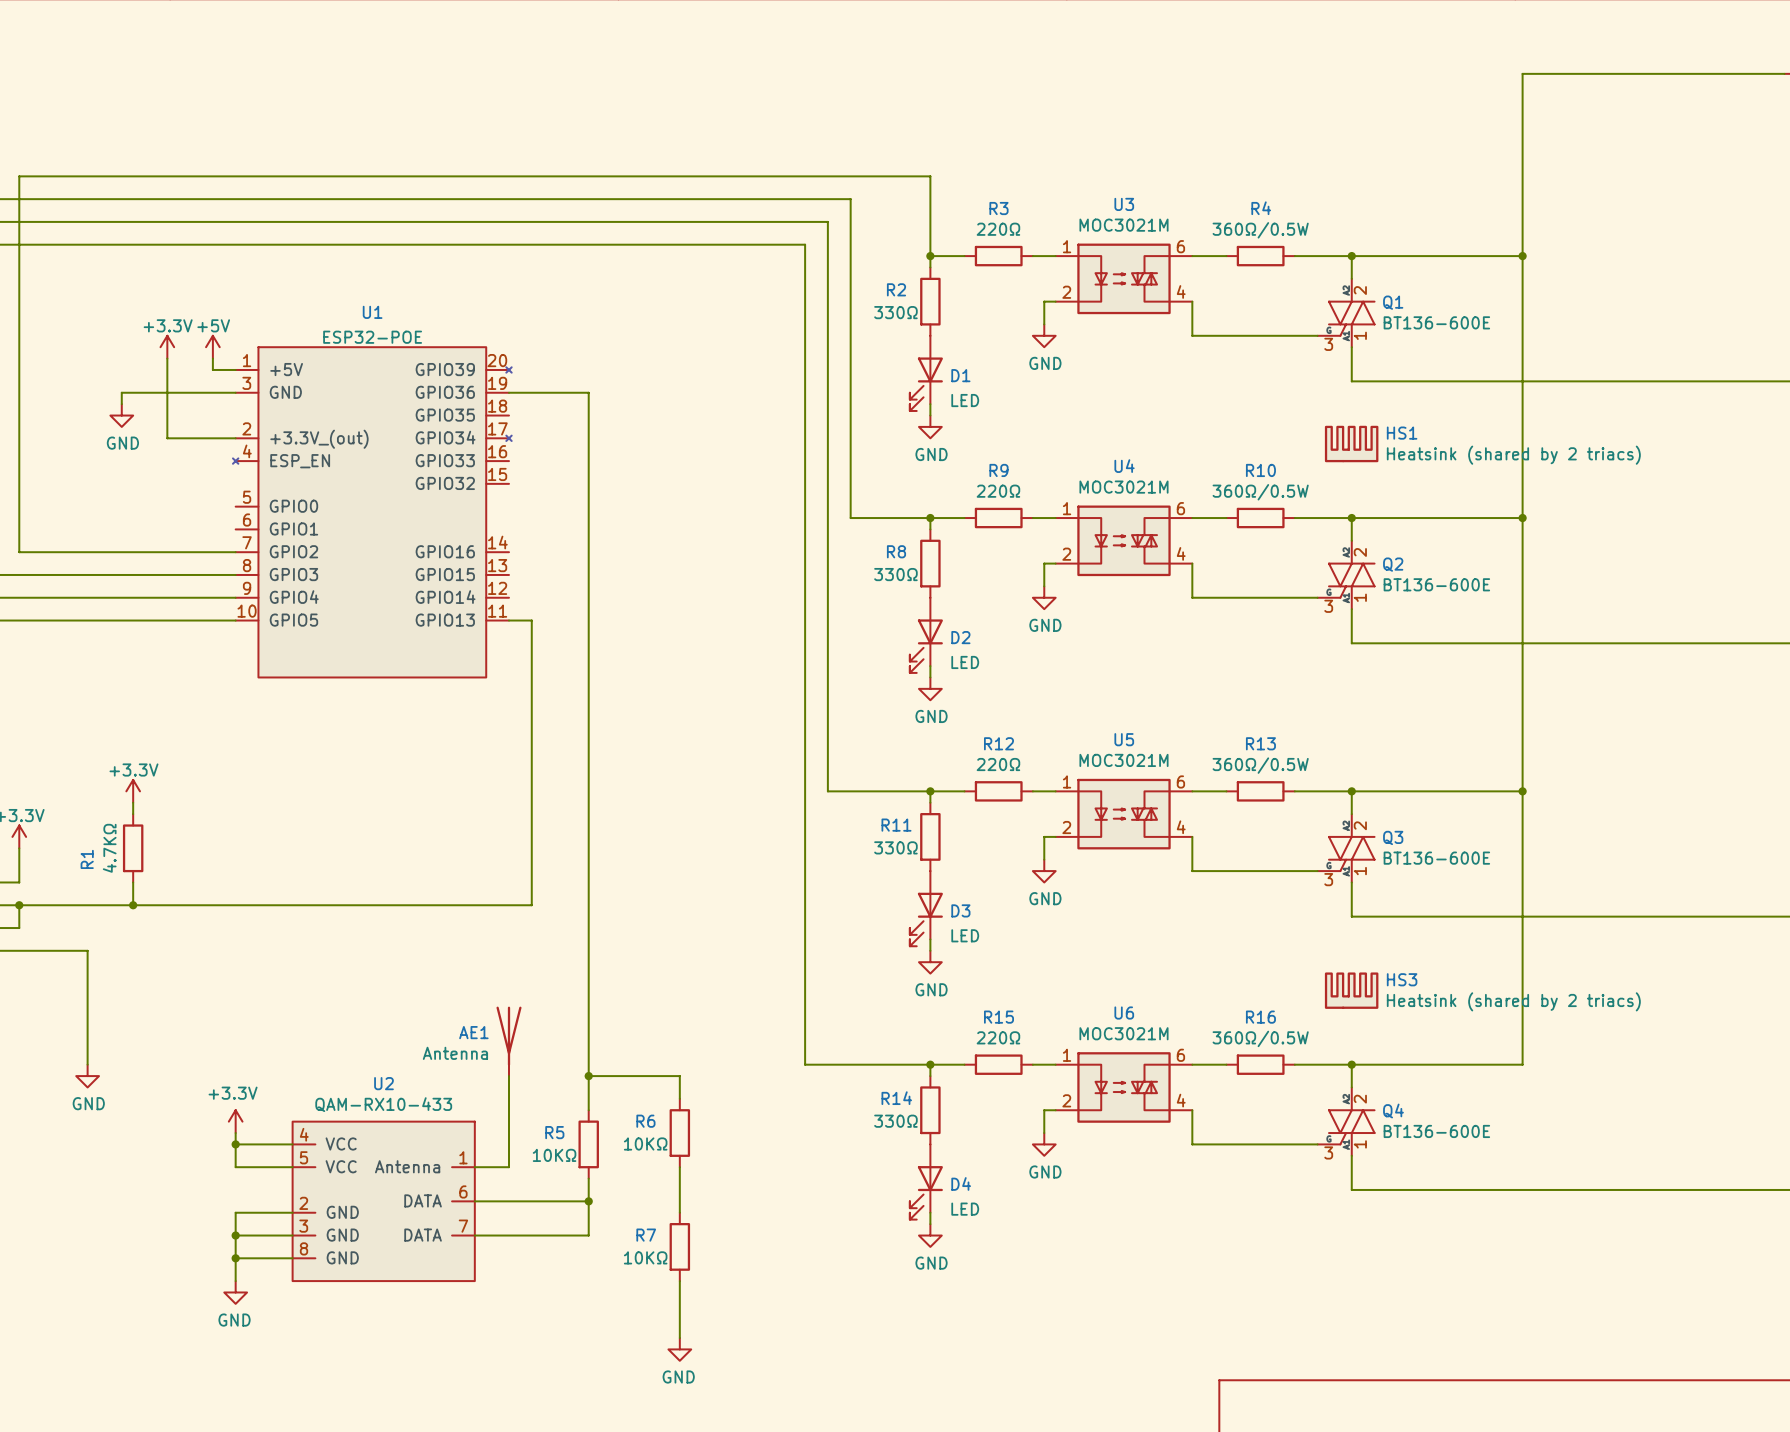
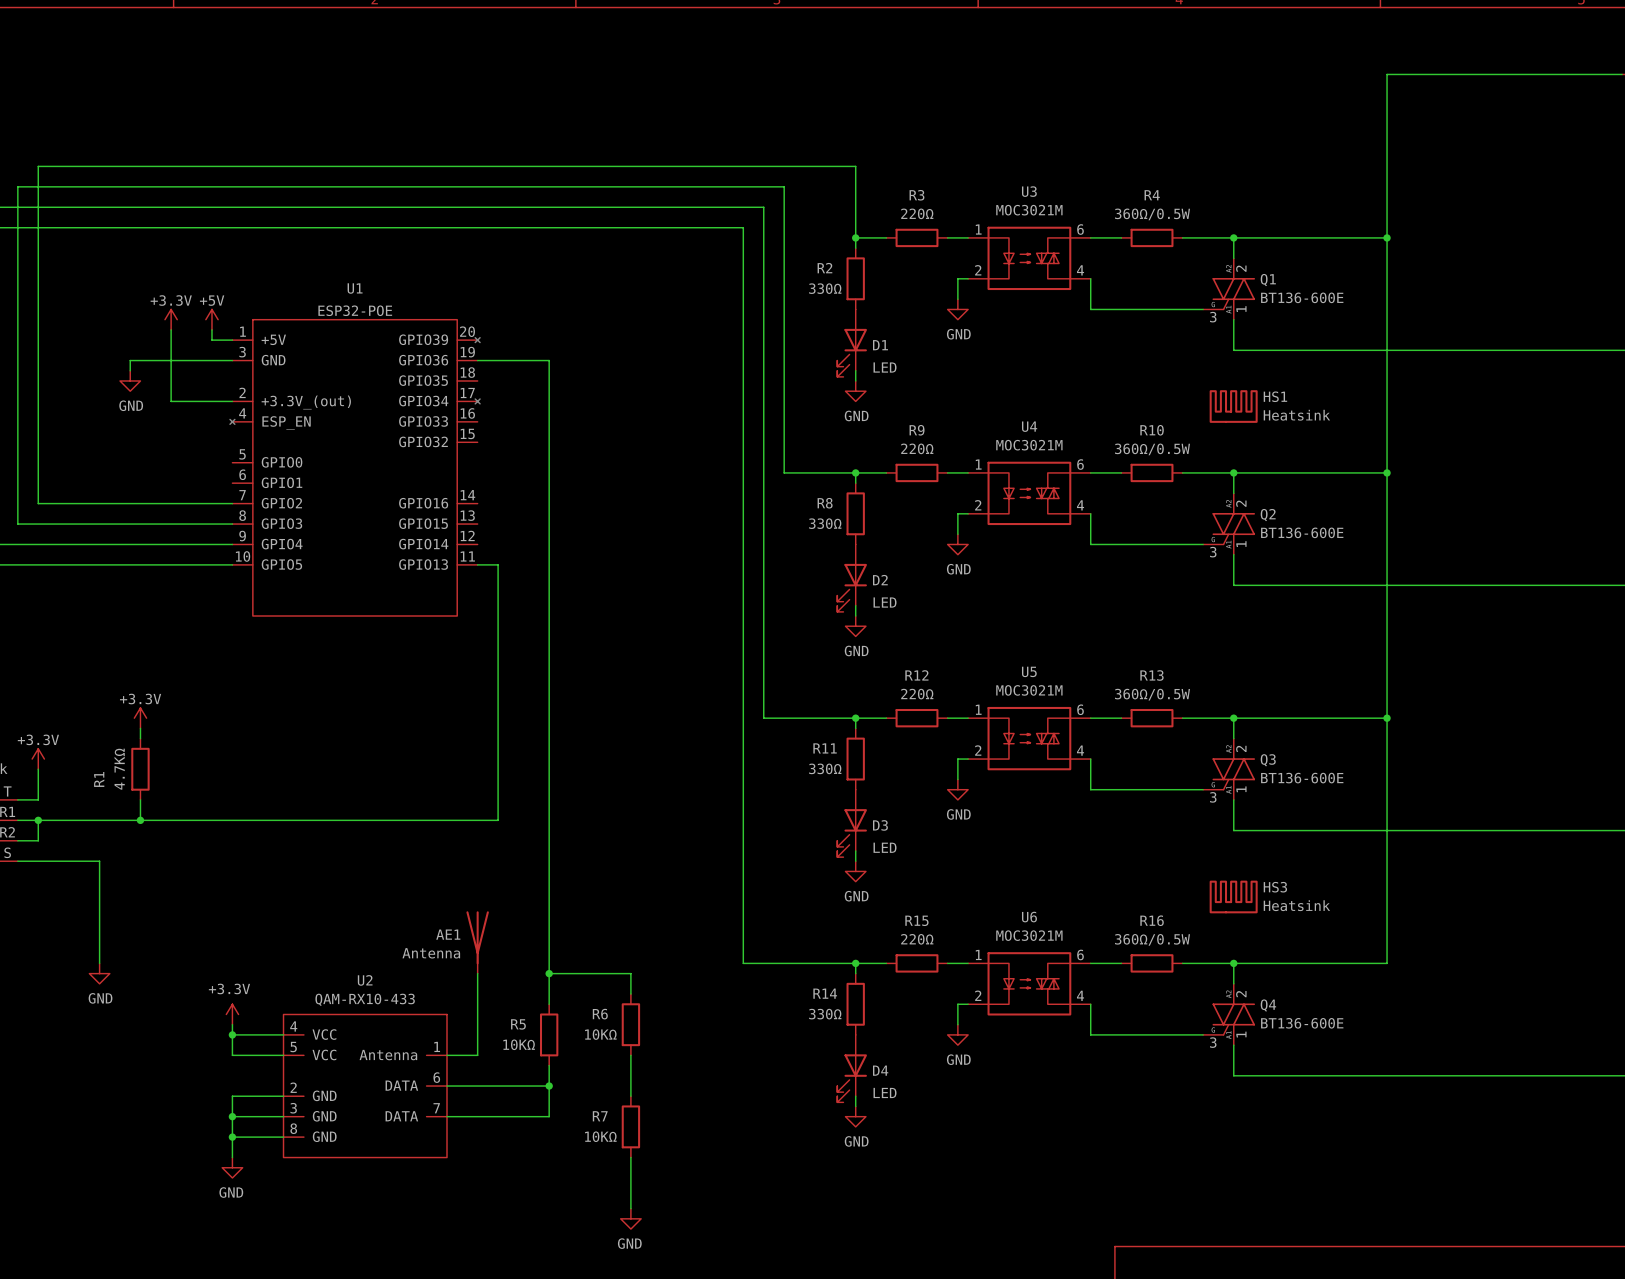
HS1 value: Heatsink (shared by 2 triacs) (1513, 455) -> Heatsink (1296, 415)
HS3 value: Heatsink (shared by 2 triacs) (1513, 1001) -> Heatsink (1296, 905)

